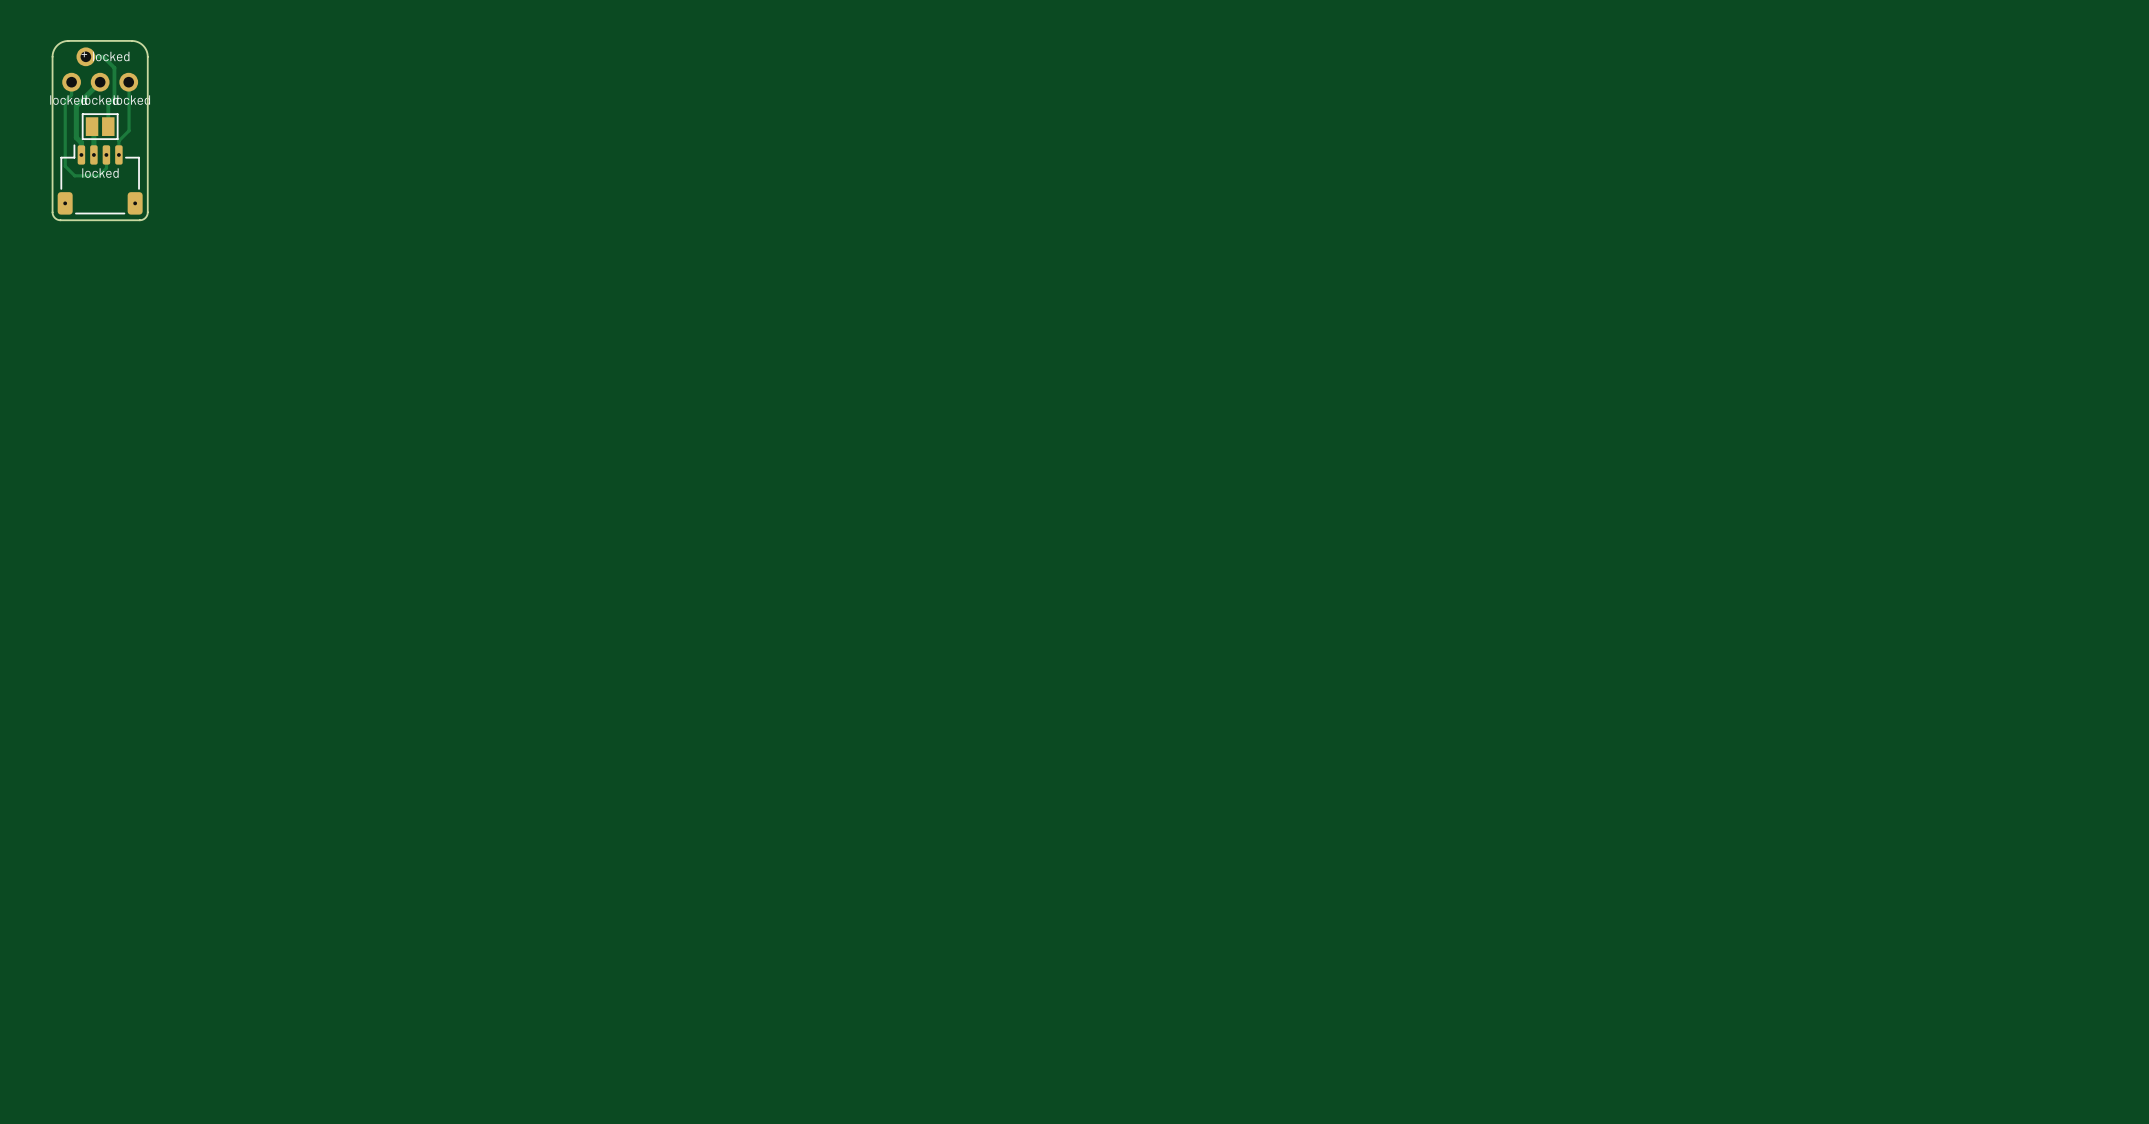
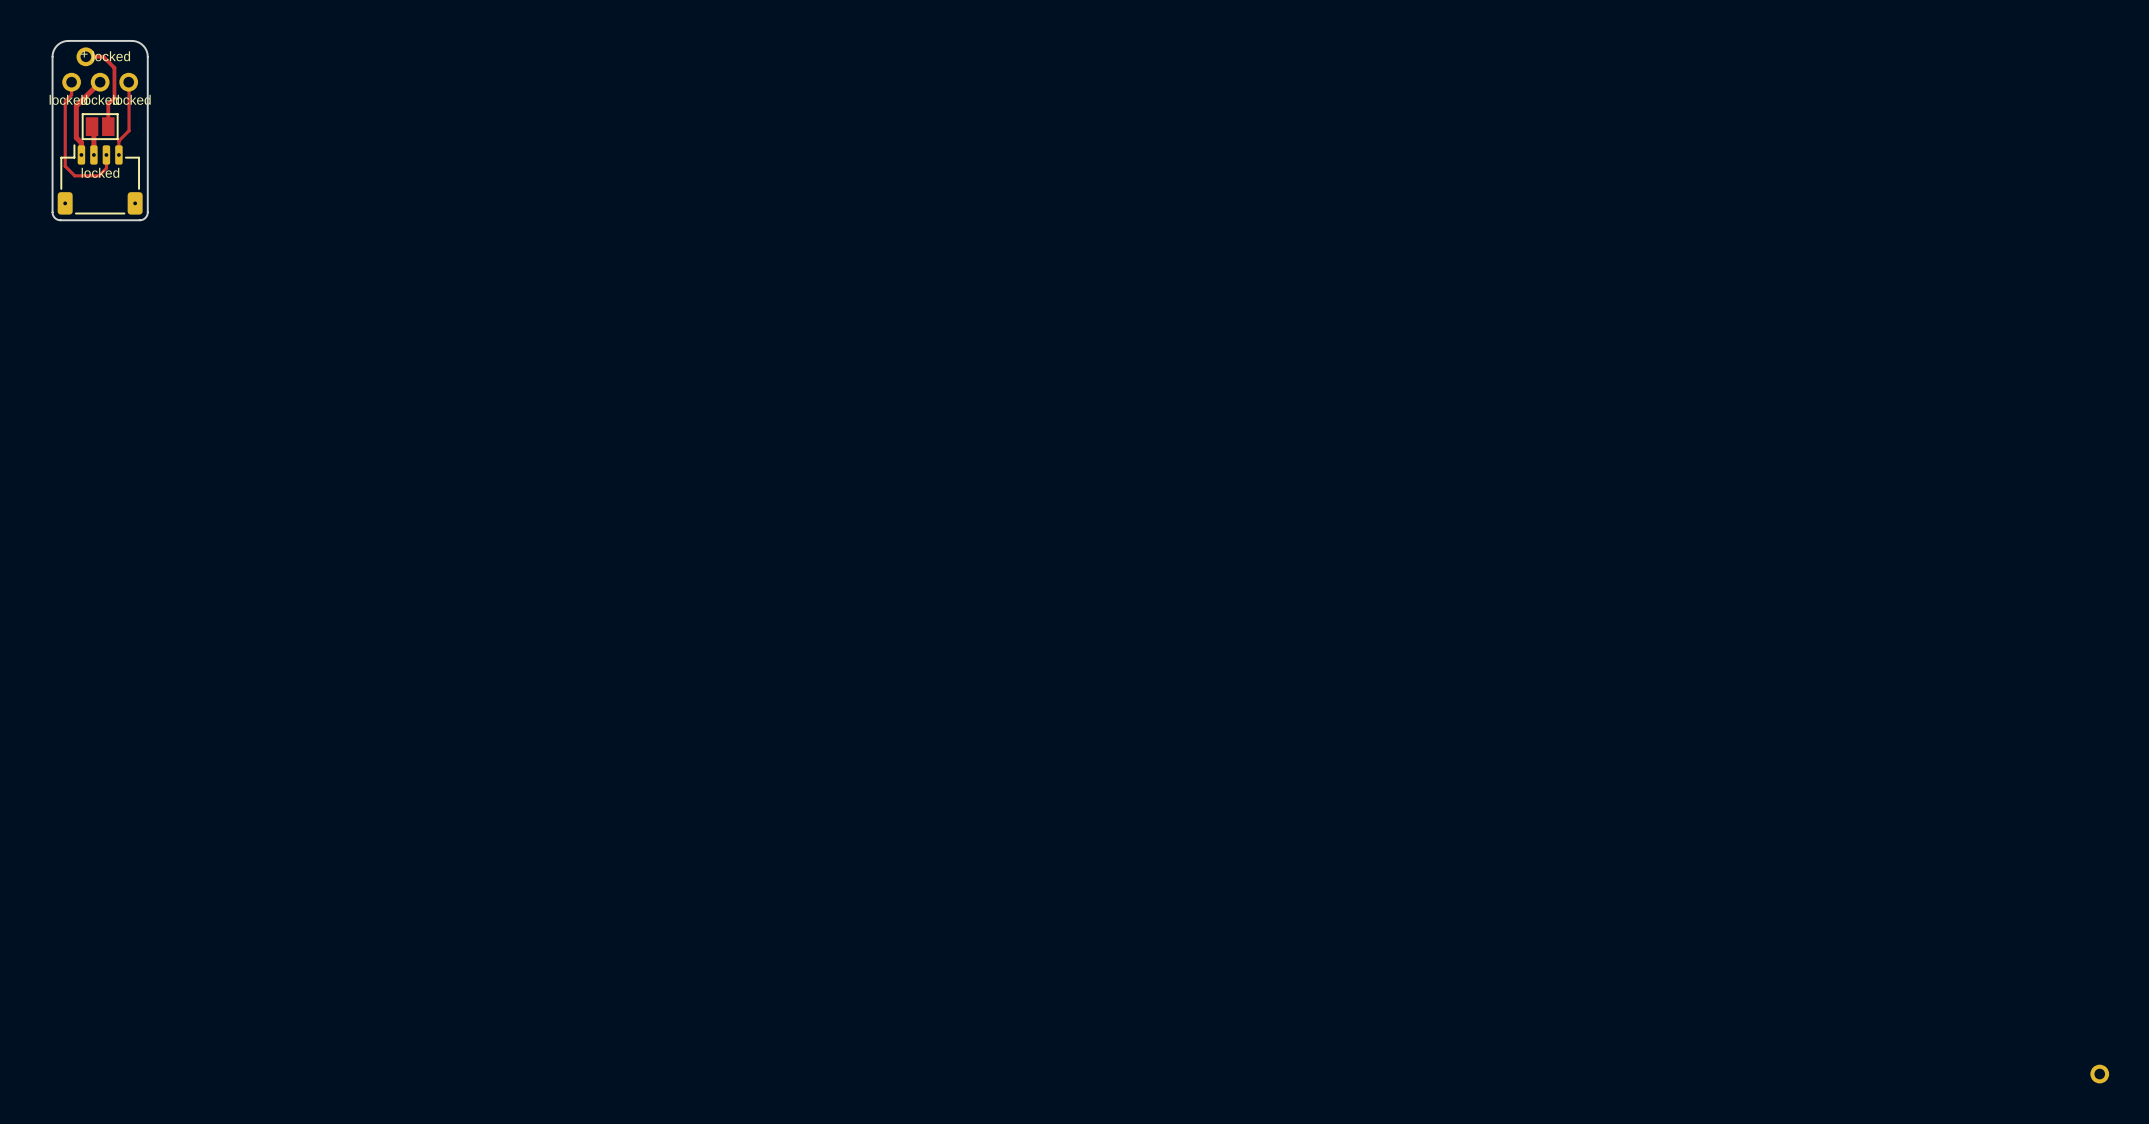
part: none -> (2099, 1074)

